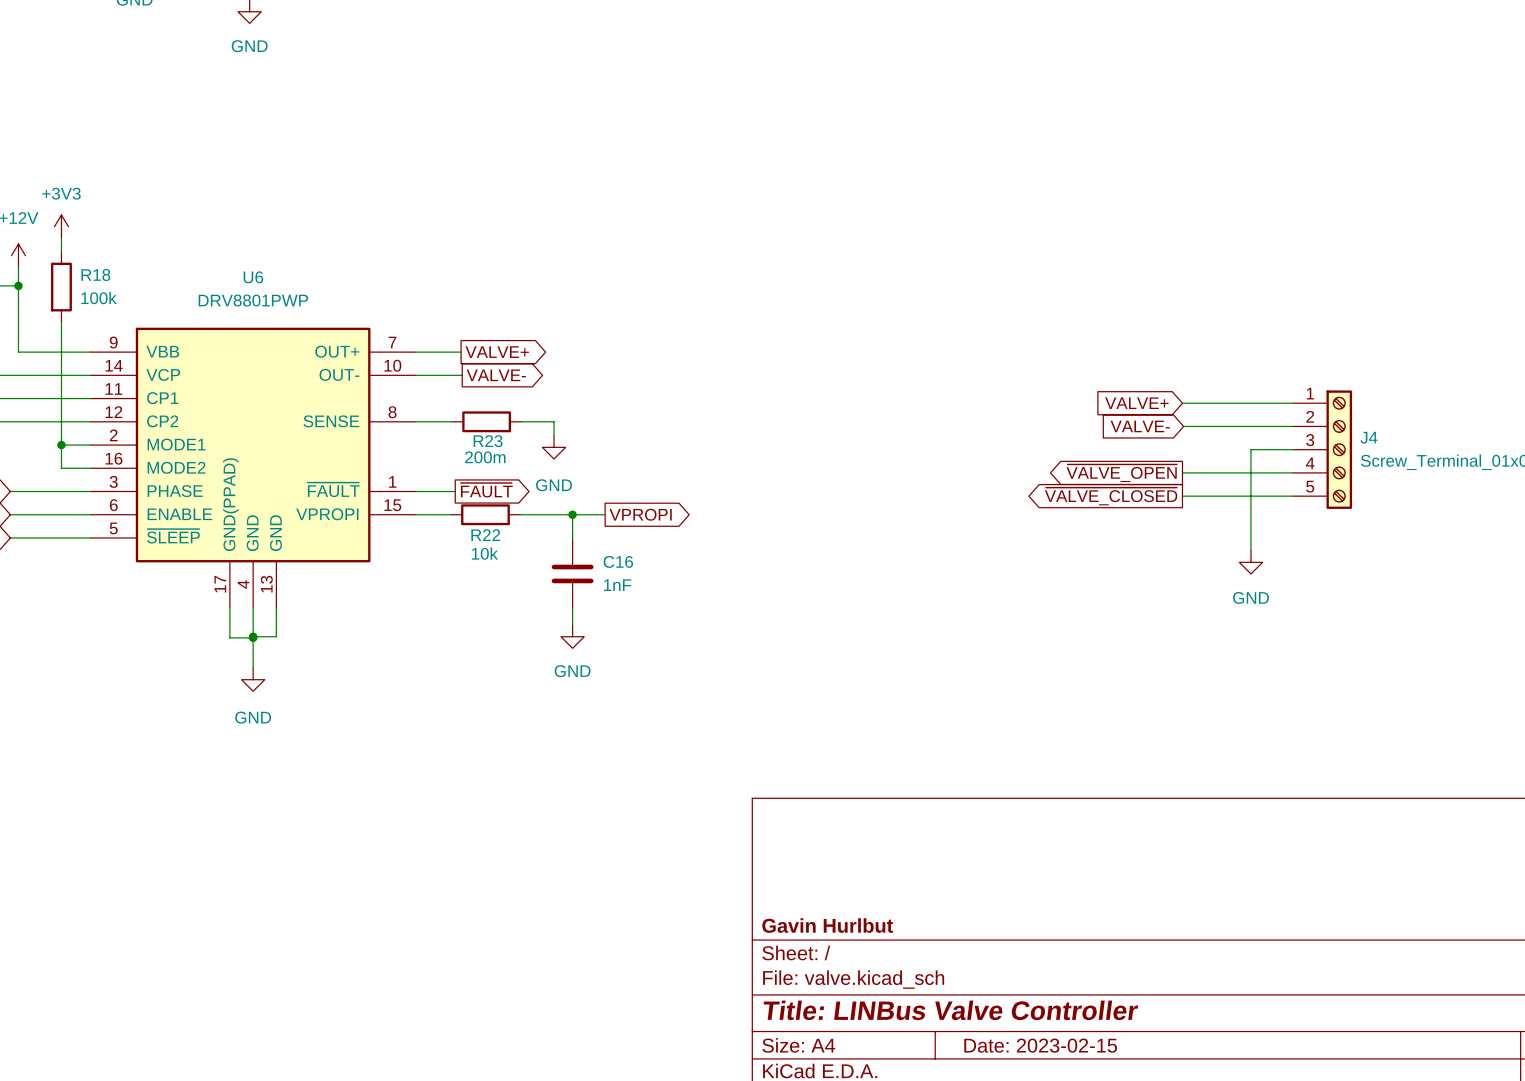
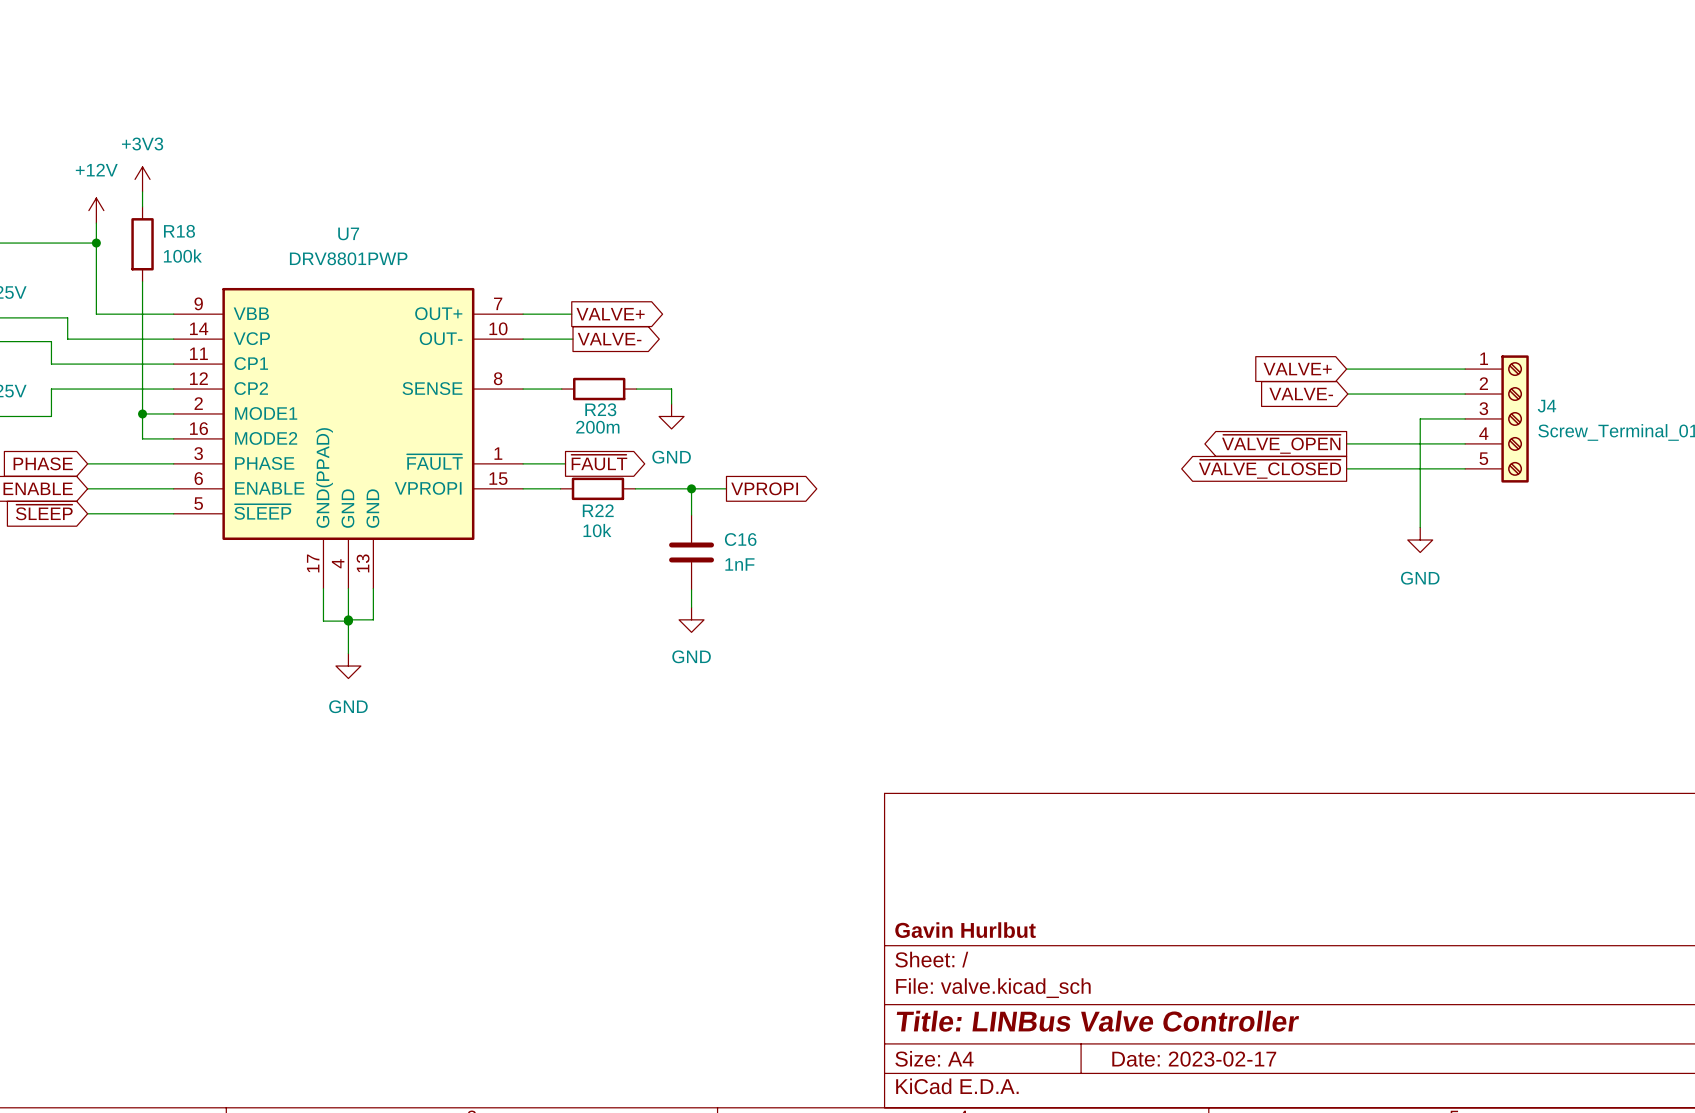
U6 name: U6 (253, 277) -> U7 (348, 233)
title block: Date: 2023-02-15 (1040, 1045) -> Date: 2023-02-17 (1194, 1059)

